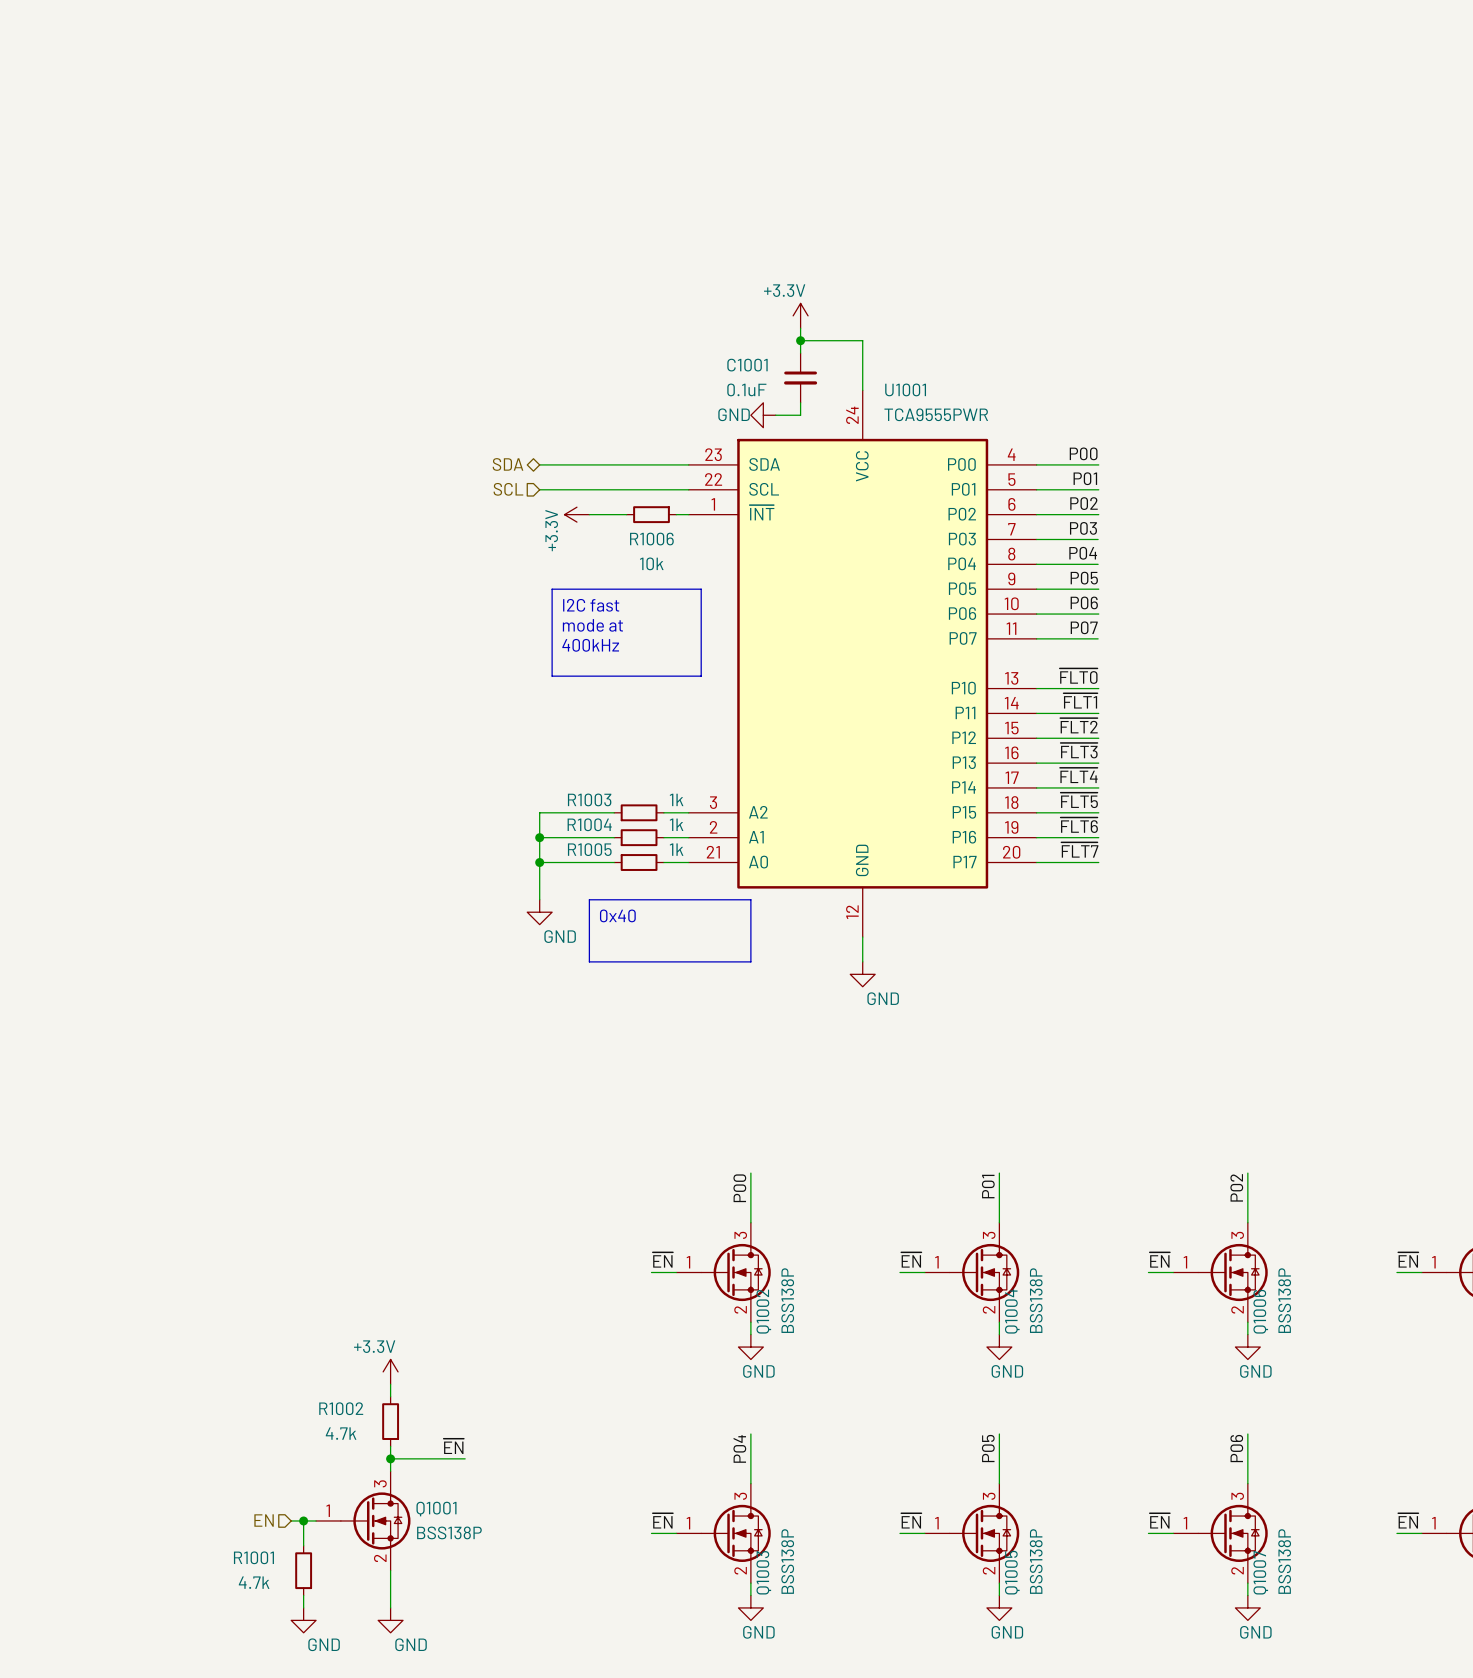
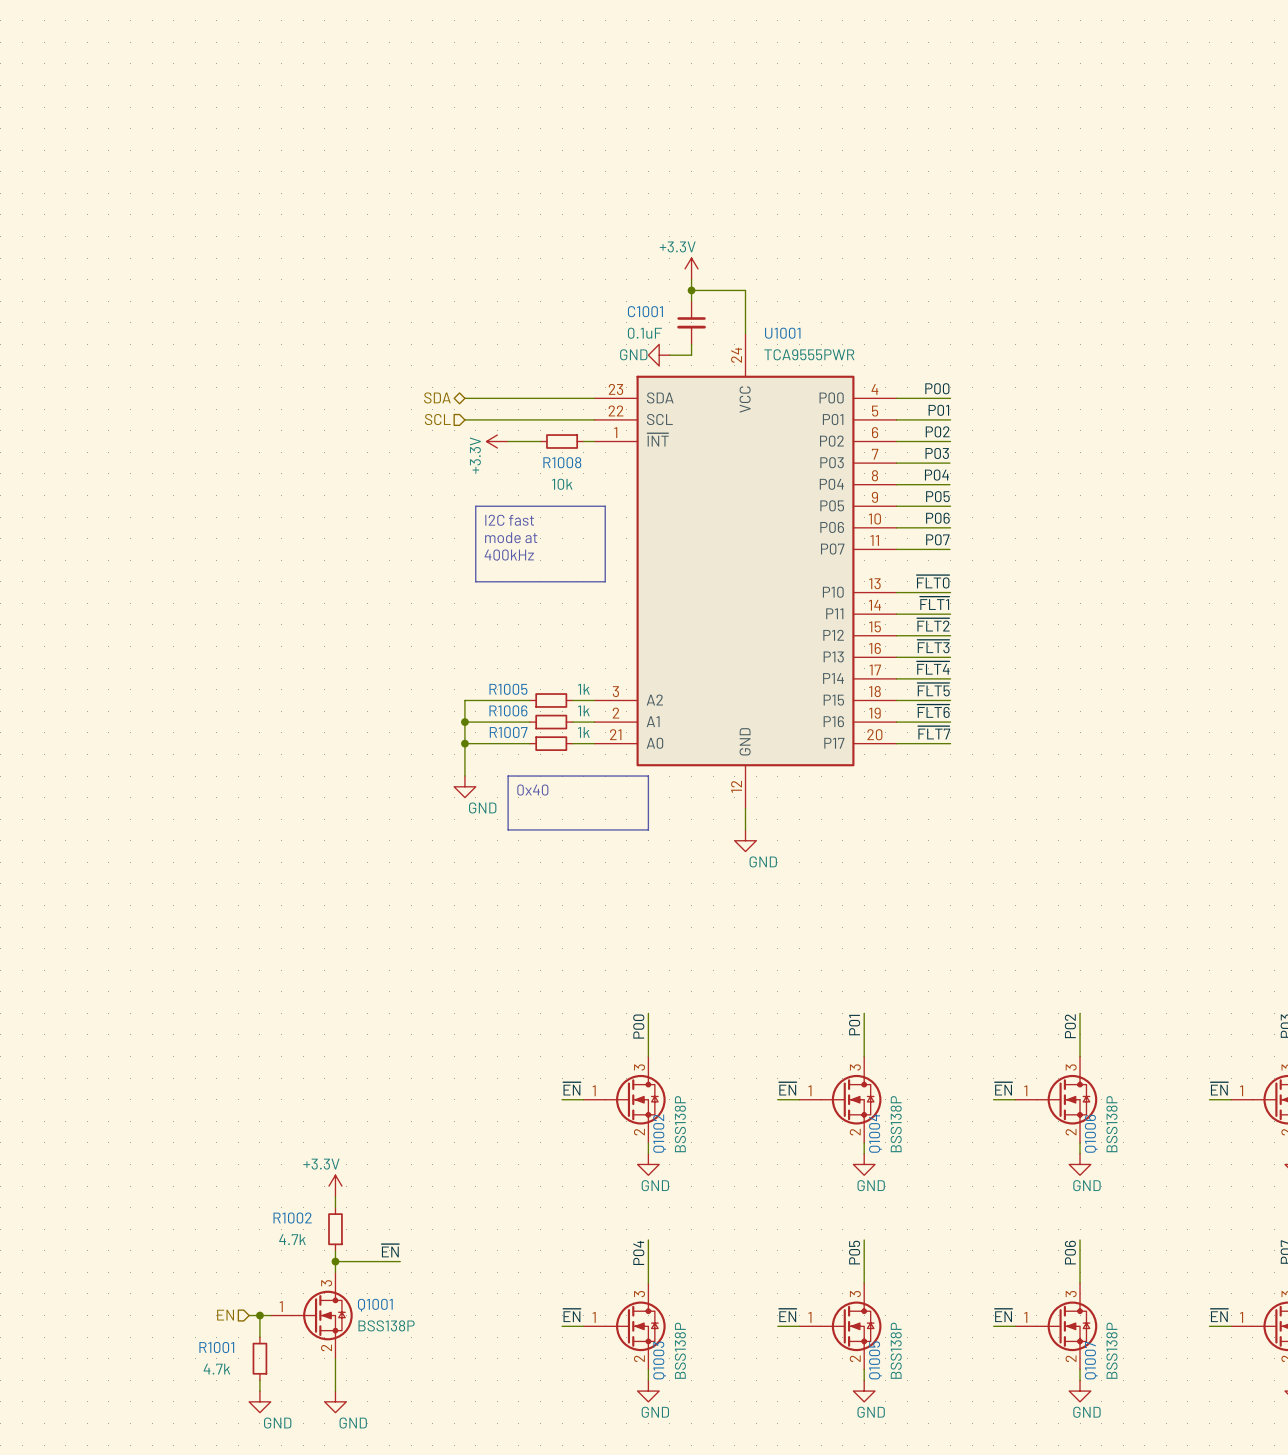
R1006 name: R1006 (651, 539) -> R1008 (562, 462)
R1003 name: R1003 (589, 799) -> R1005 (508, 689)
R1004 name: R1004 (589, 824) -> R1006 (508, 710)
R1005 name: R1005 (589, 849) -> R1007 (508, 732)

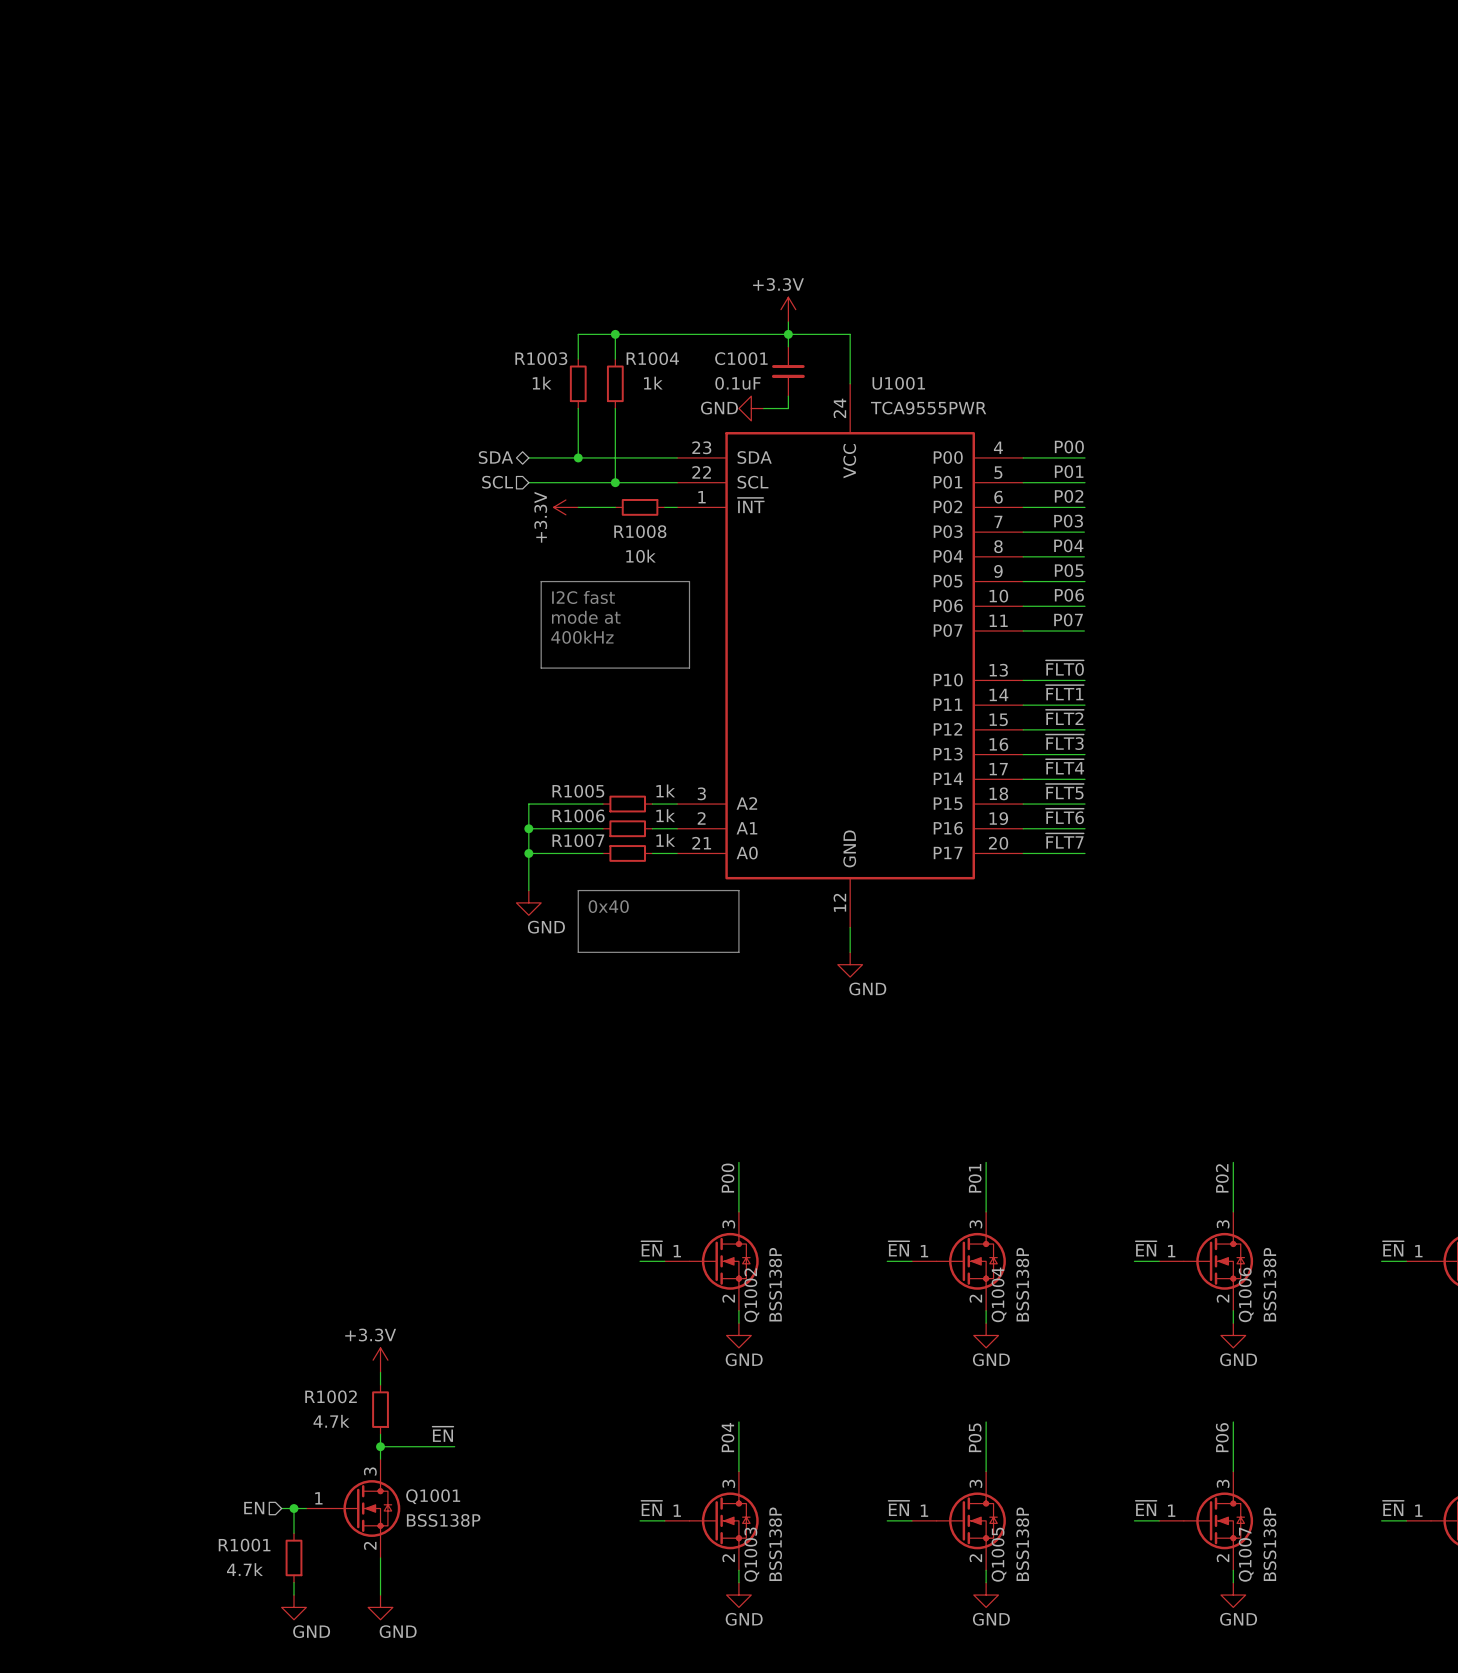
wire: none -> (615, 334) (615, 359)
junction: none -> (615, 334)
wire: none -> (788, 334) (578, 334) (578, 359)
R1003: none -> 1k (578, 383)
R1004: none -> 1k (615, 383)
wire: none -> (578, 408) (578, 457)
wire: none -> (615, 408) (615, 482)
junction: none -> (578, 457)
junction: none -> (615, 482)

